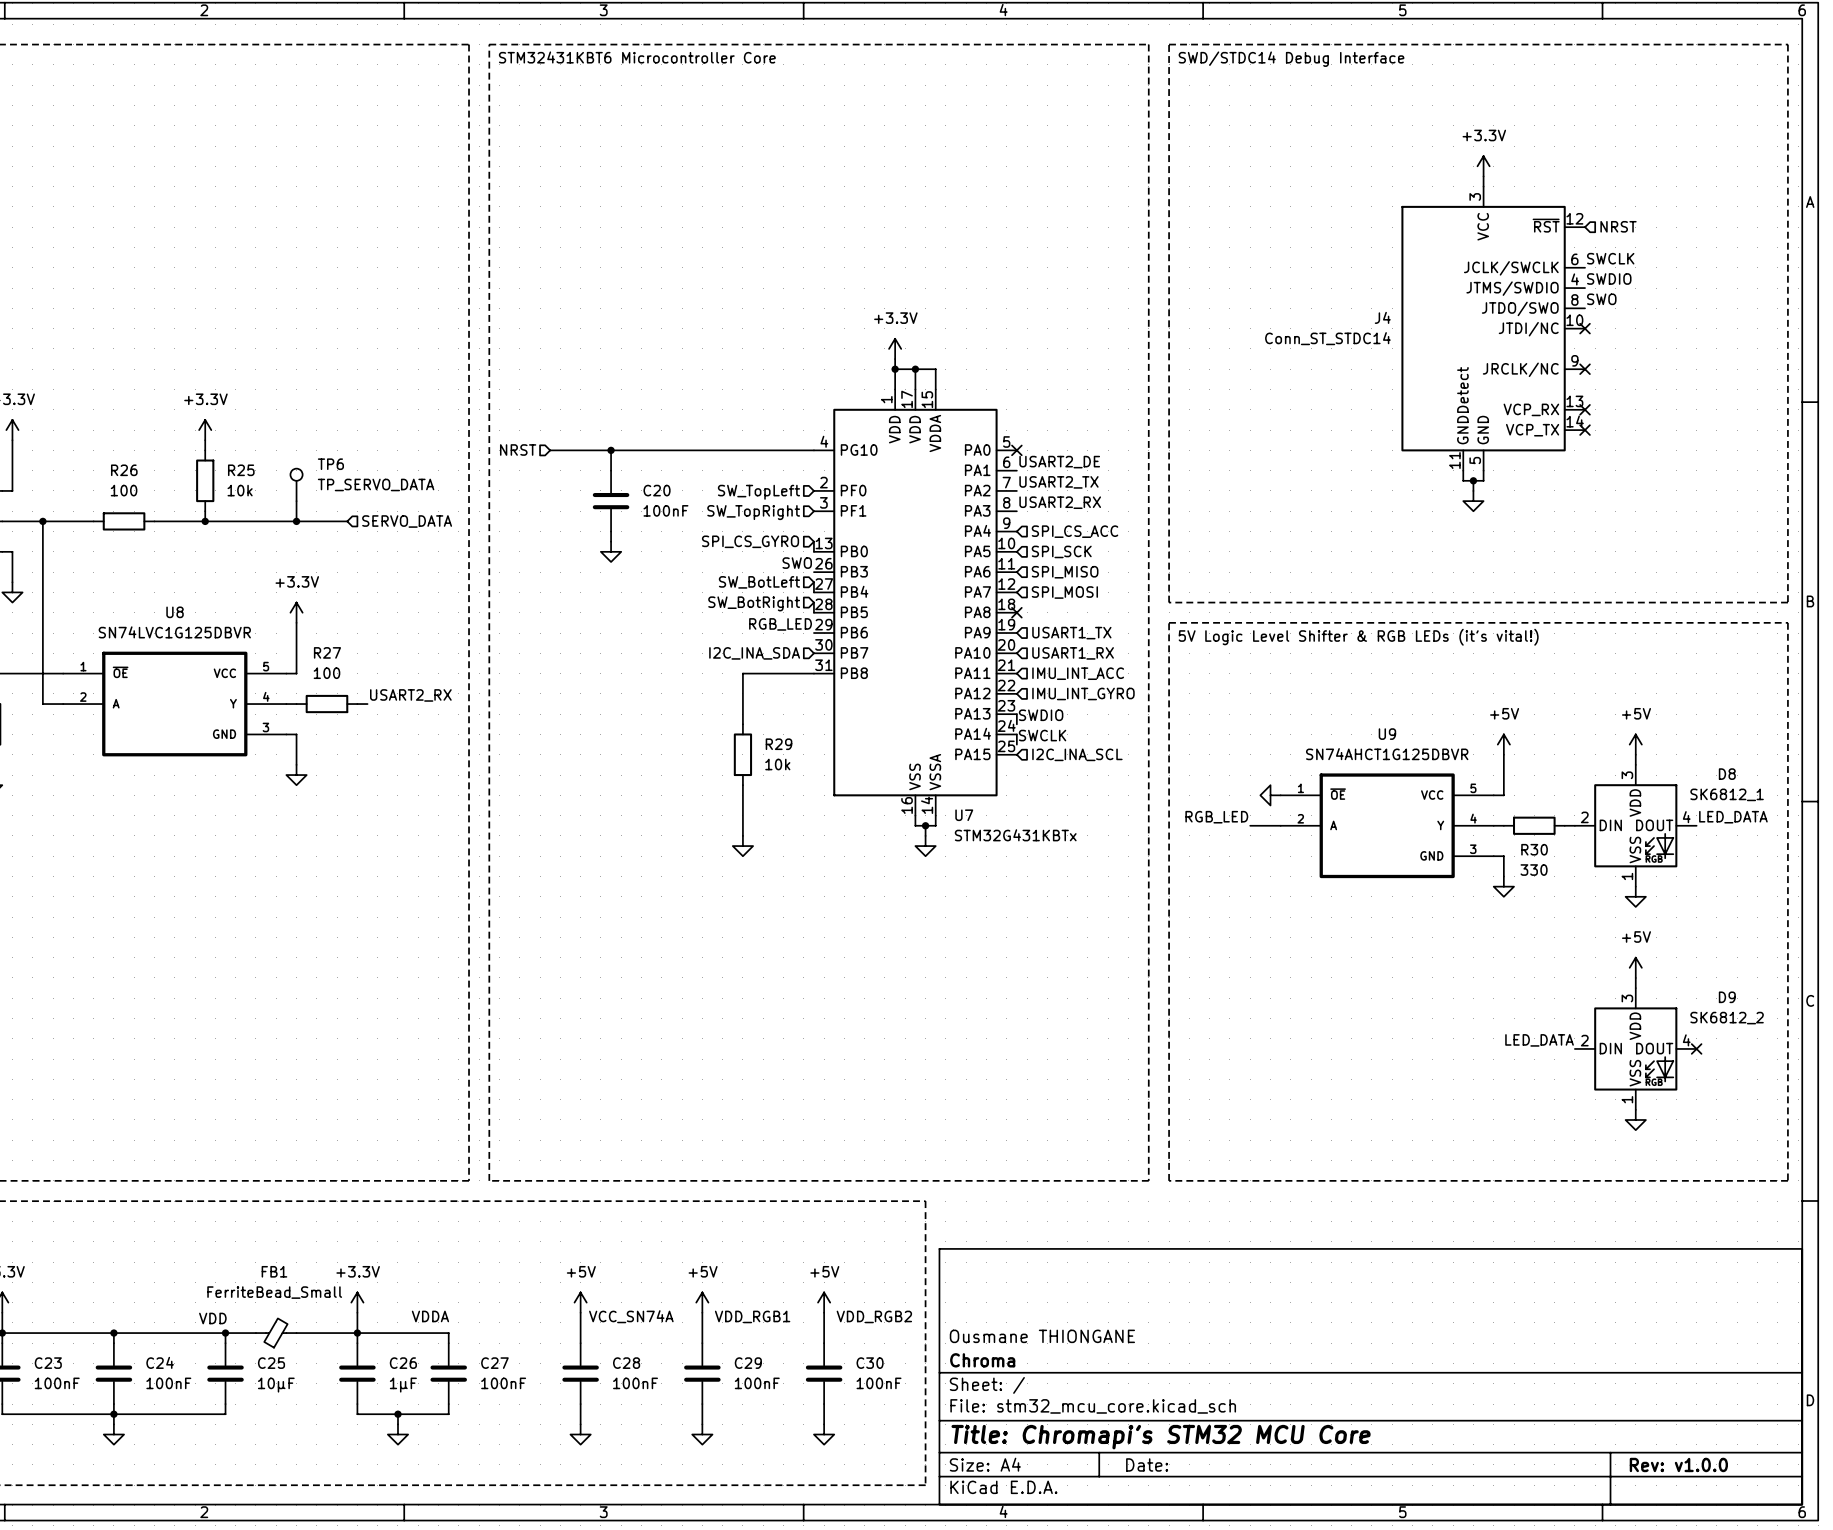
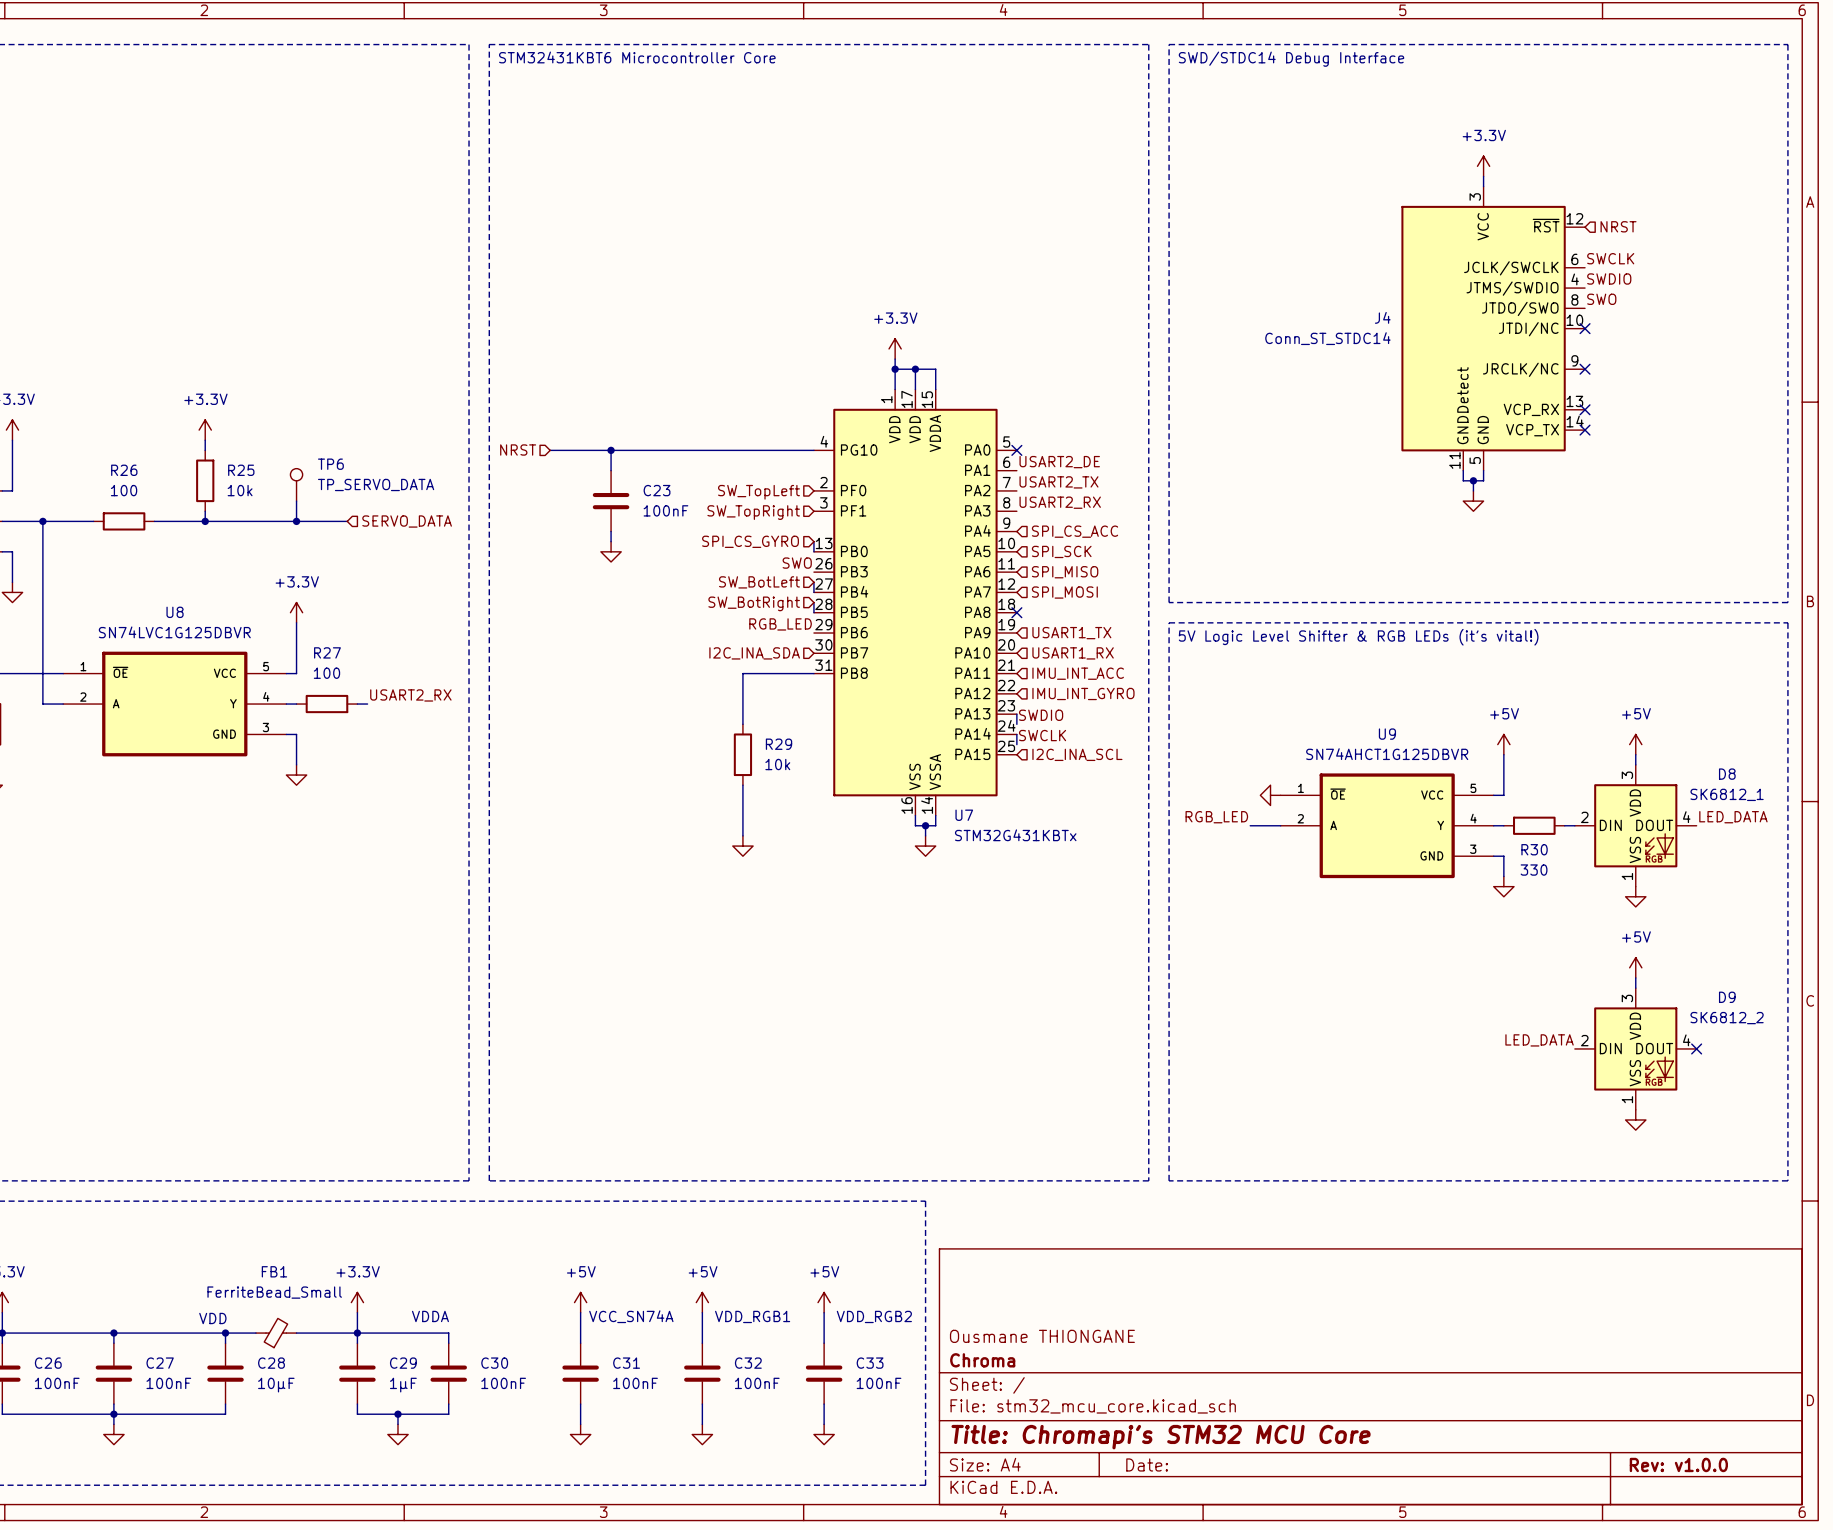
C20 name: C20 (657, 490) -> C23 (657, 490)
C24 name: C24 (160, 1362) -> C27 (160, 1363)
C23 name: C23 (48, 1363) -> C26 (48, 1363)
C25 name: C25 (271, 1363) -> C28 (271, 1363)
C26 name: C26 (403, 1363) -> C29 (403, 1363)
C27 name: C27 (494, 1363) -> C30 (494, 1363)
C28 name: C28 (626, 1363) -> C31 (626, 1363)
C29 name: C29 (748, 1363) -> C32 (748, 1363)
C30 name: C30 (870, 1363) -> C33 (870, 1363)

